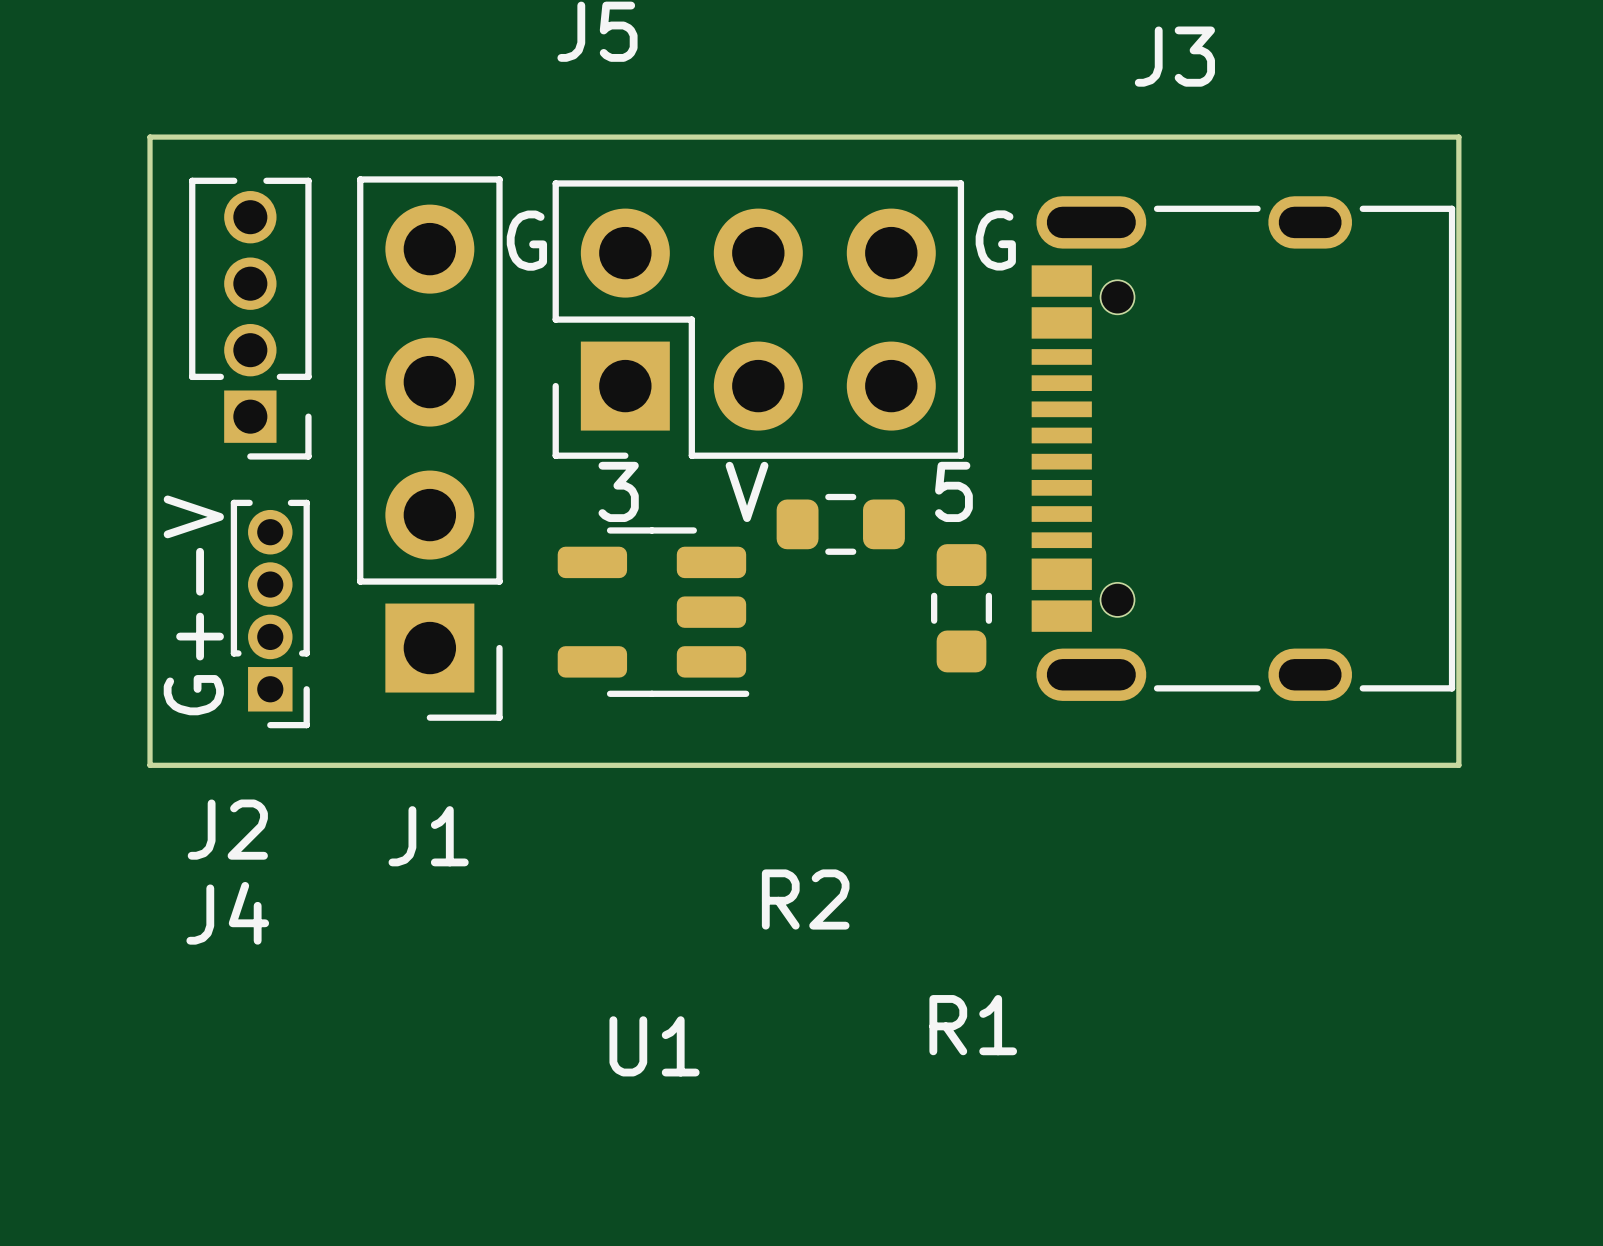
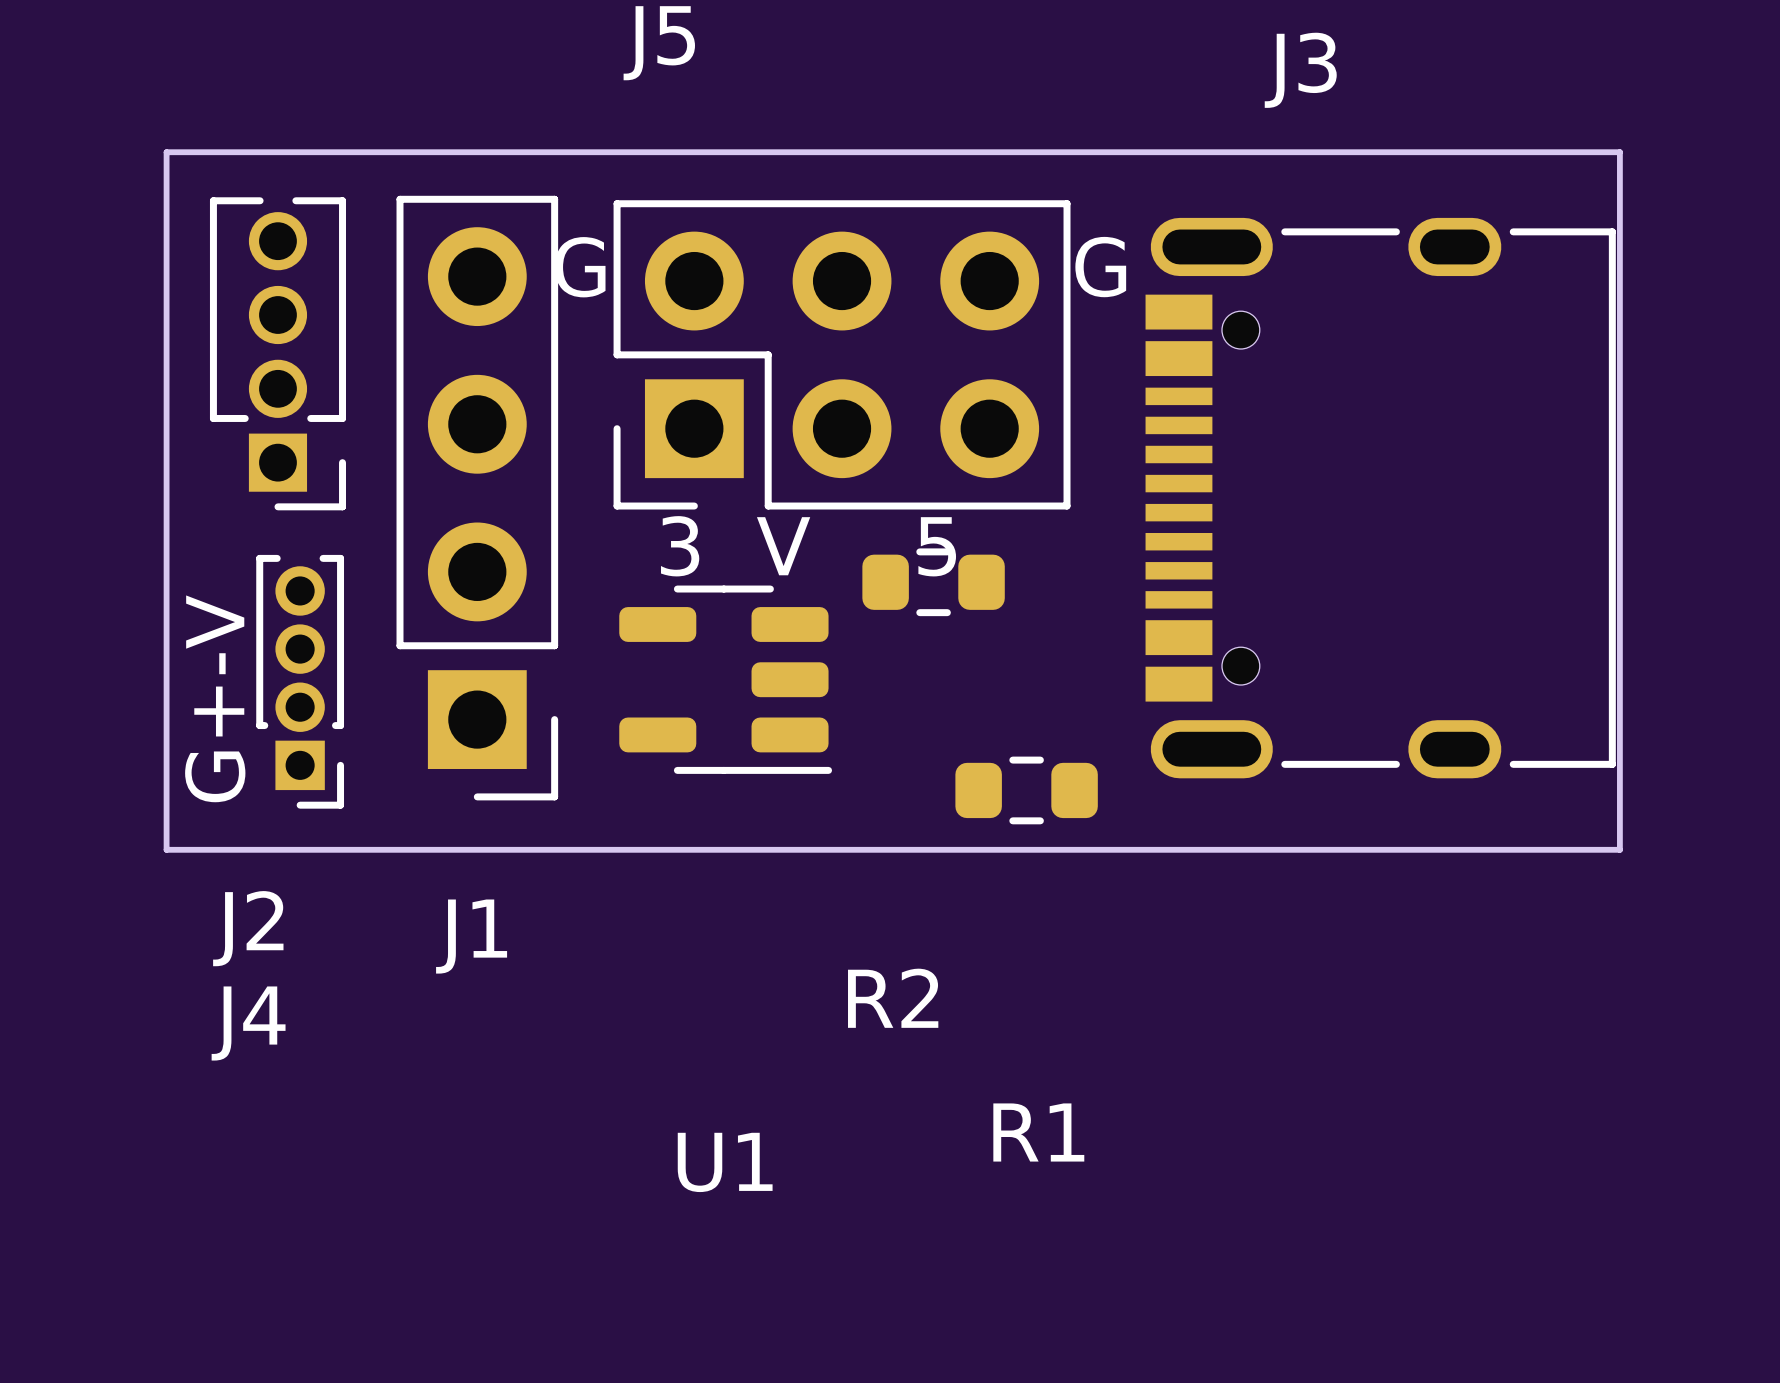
R1 rotation: 0° (961, 608) -> 90° clockwise (1026, 790)
R1 position: (961, 608) -> (1026, 790)
R1 name position: R1 (973, 1025) -> R1 (1038, 1132)

